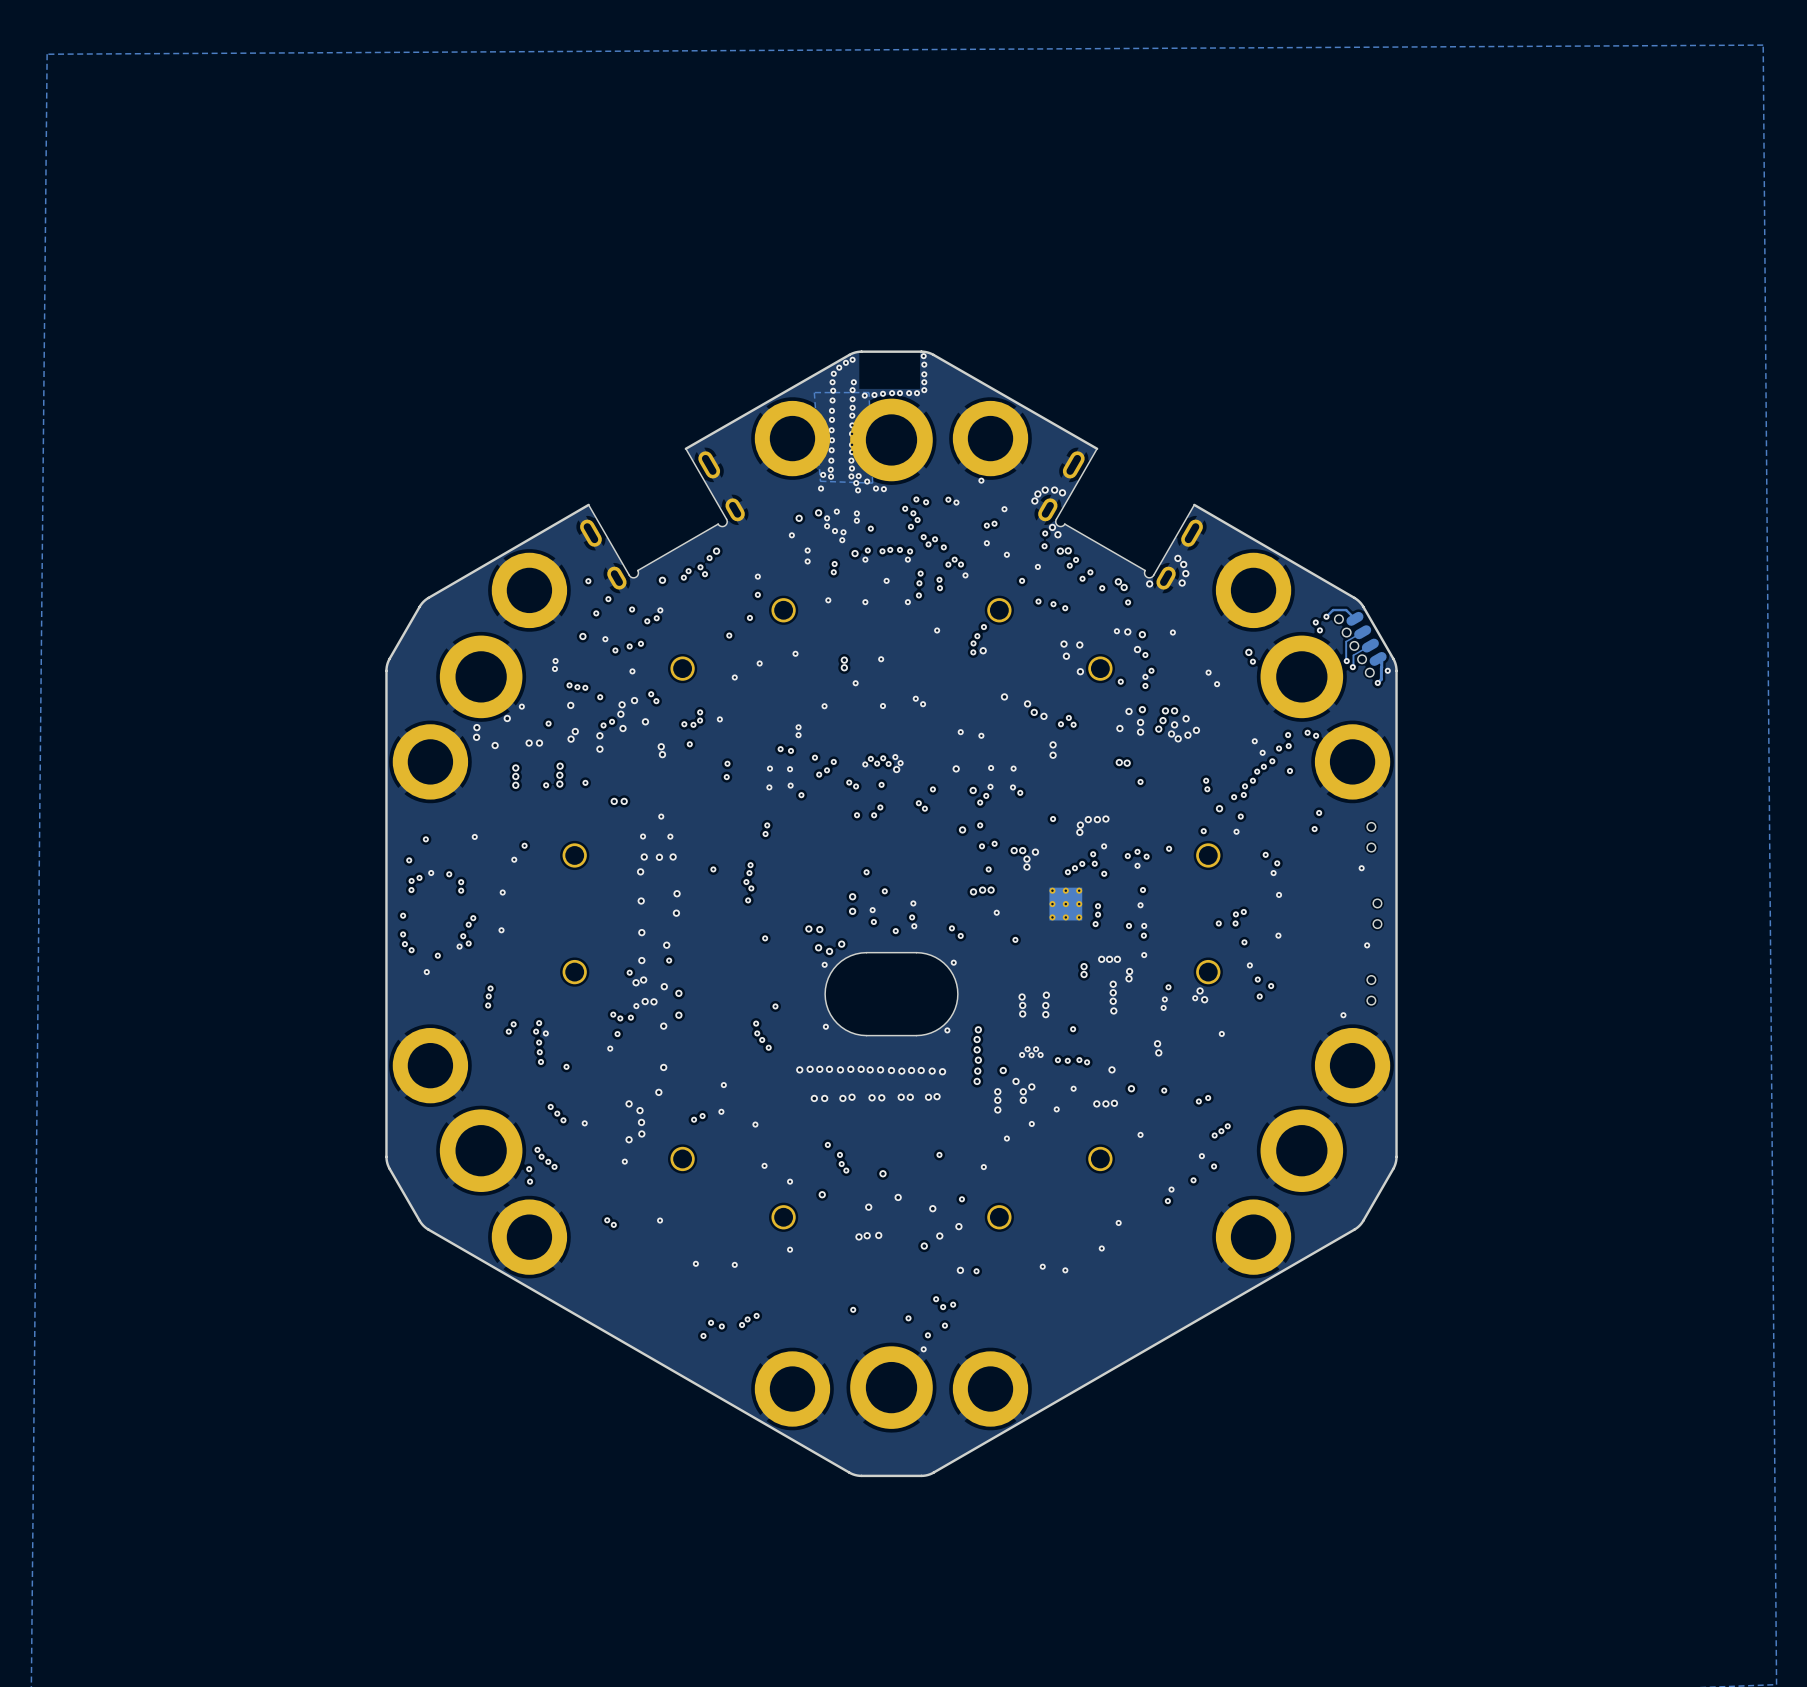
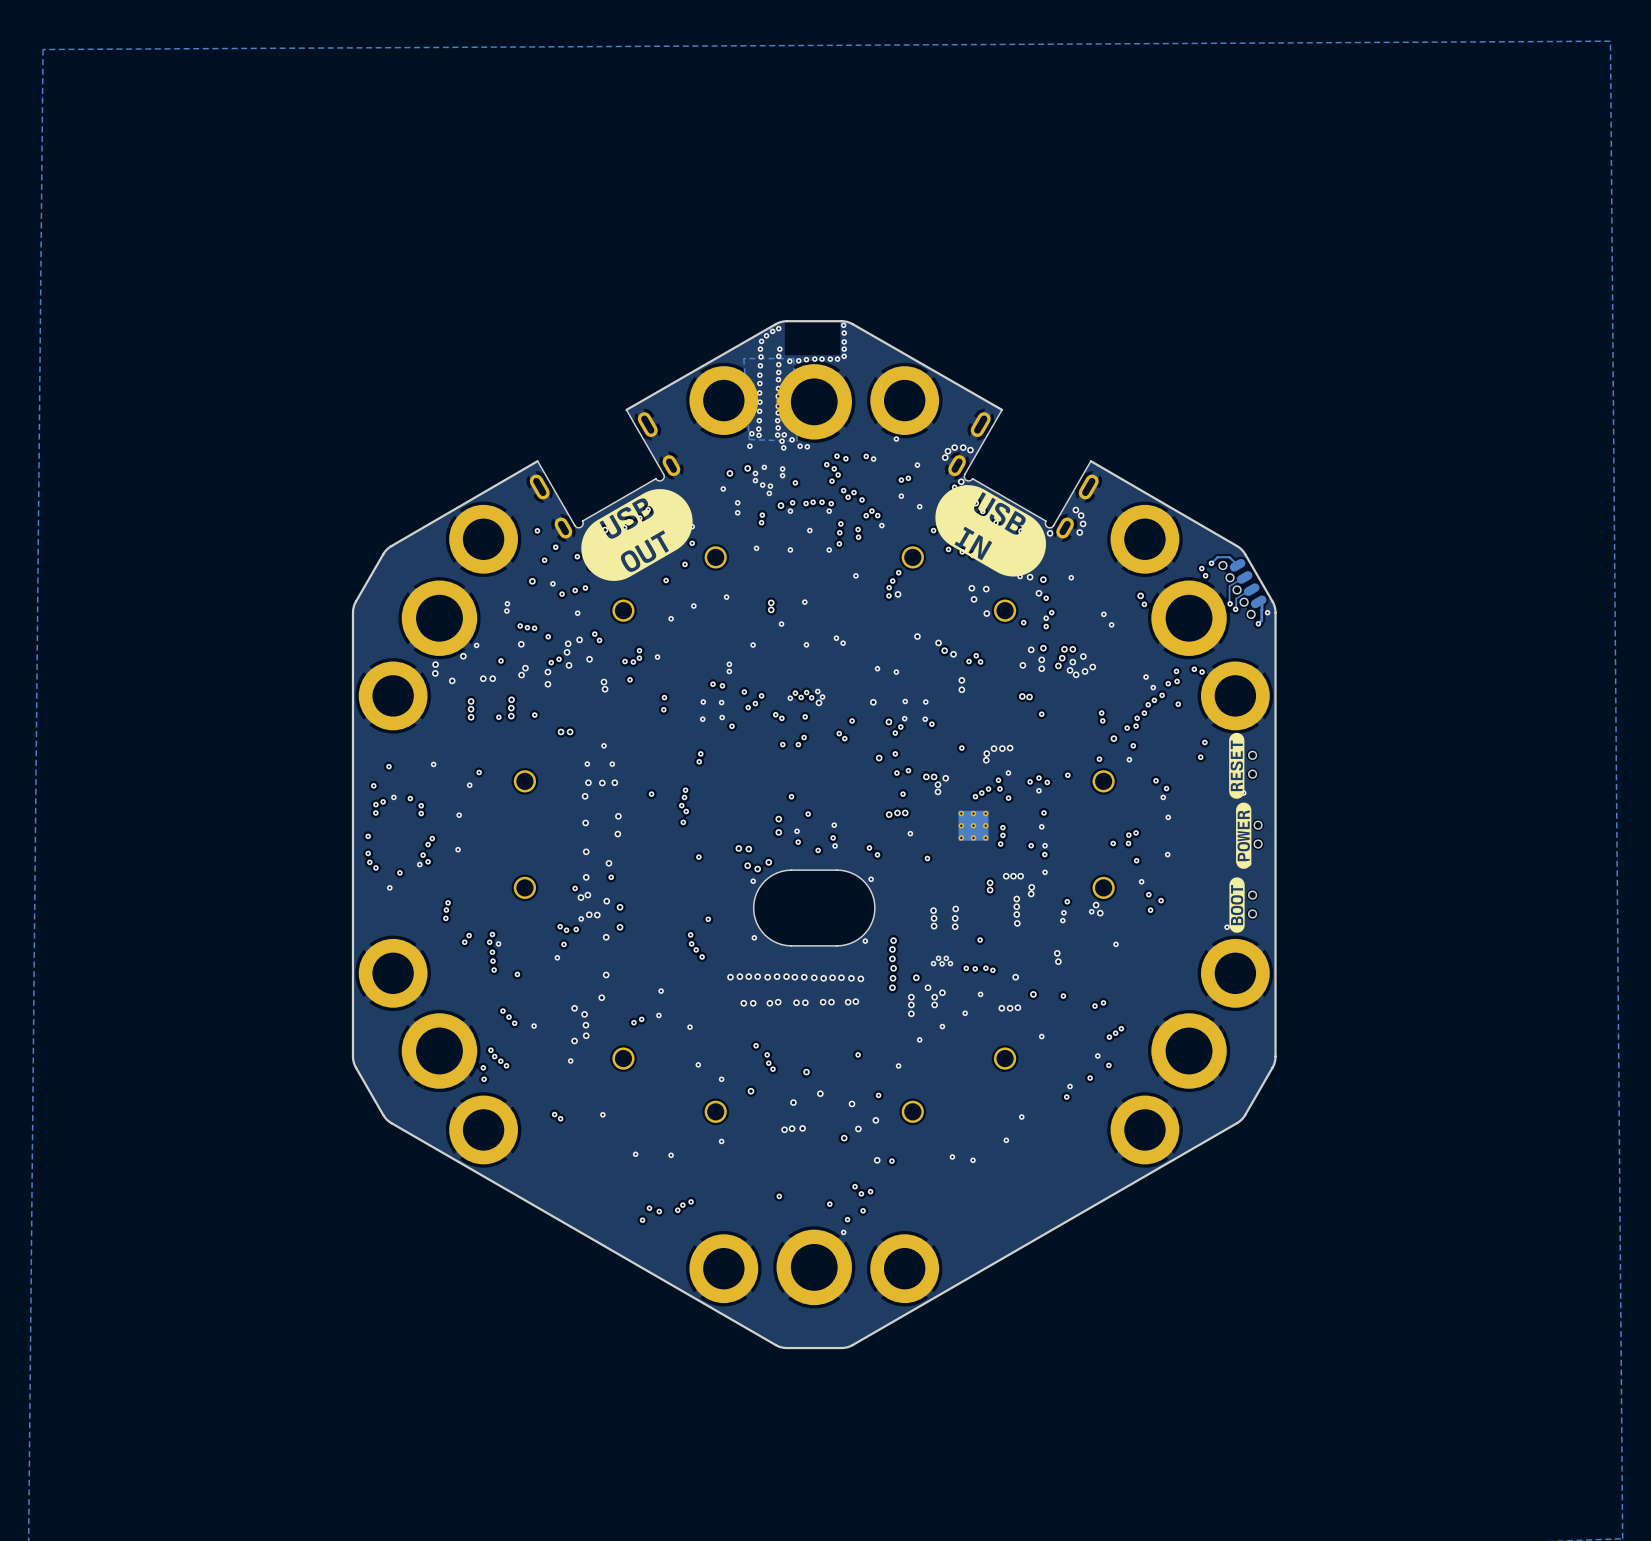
drawing: none -> [935, 485, 1046, 577]
drawing: none -> [581, 489, 693, 581]
drawing: none -> [1229, 732, 1252, 933]

